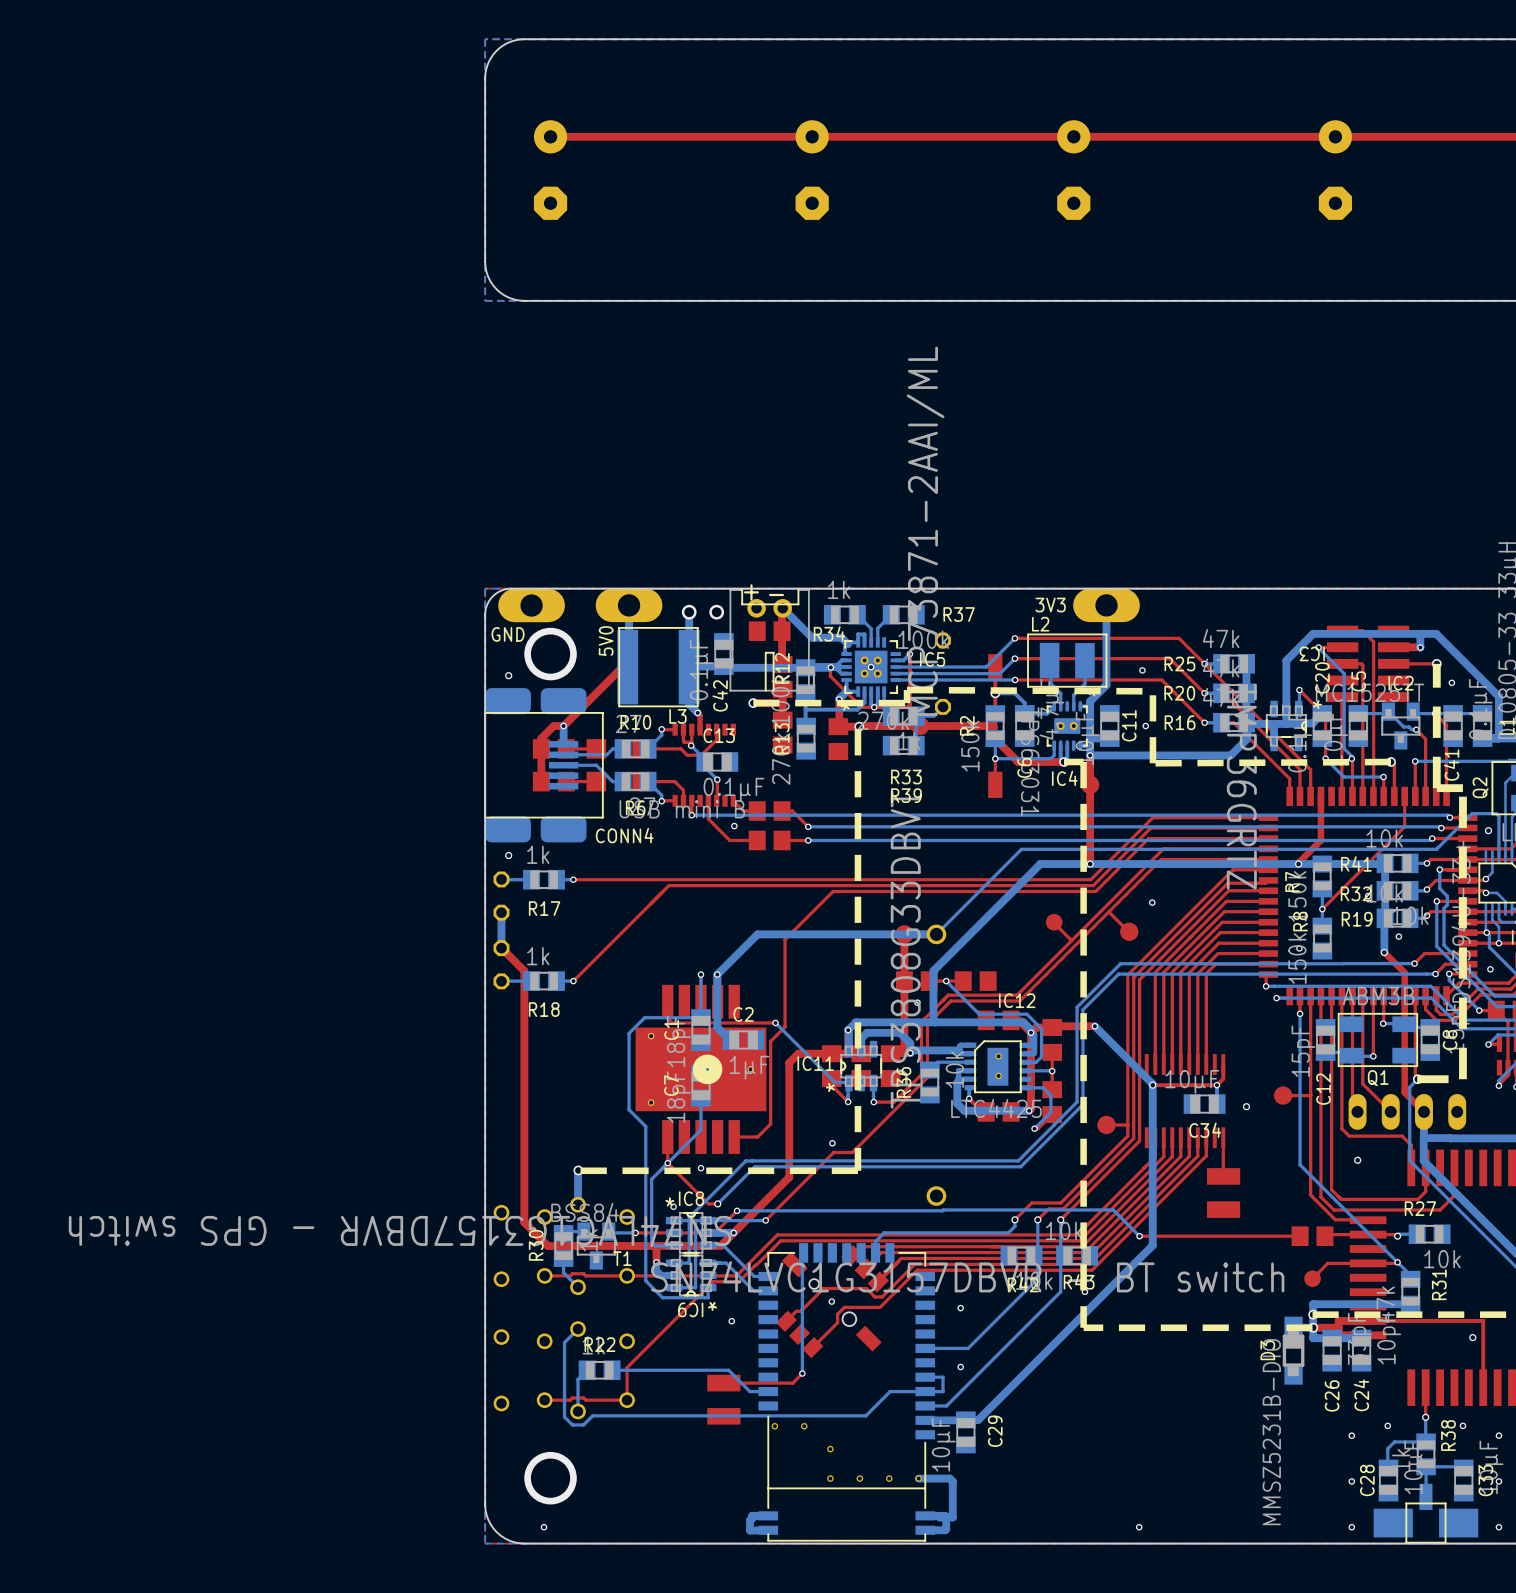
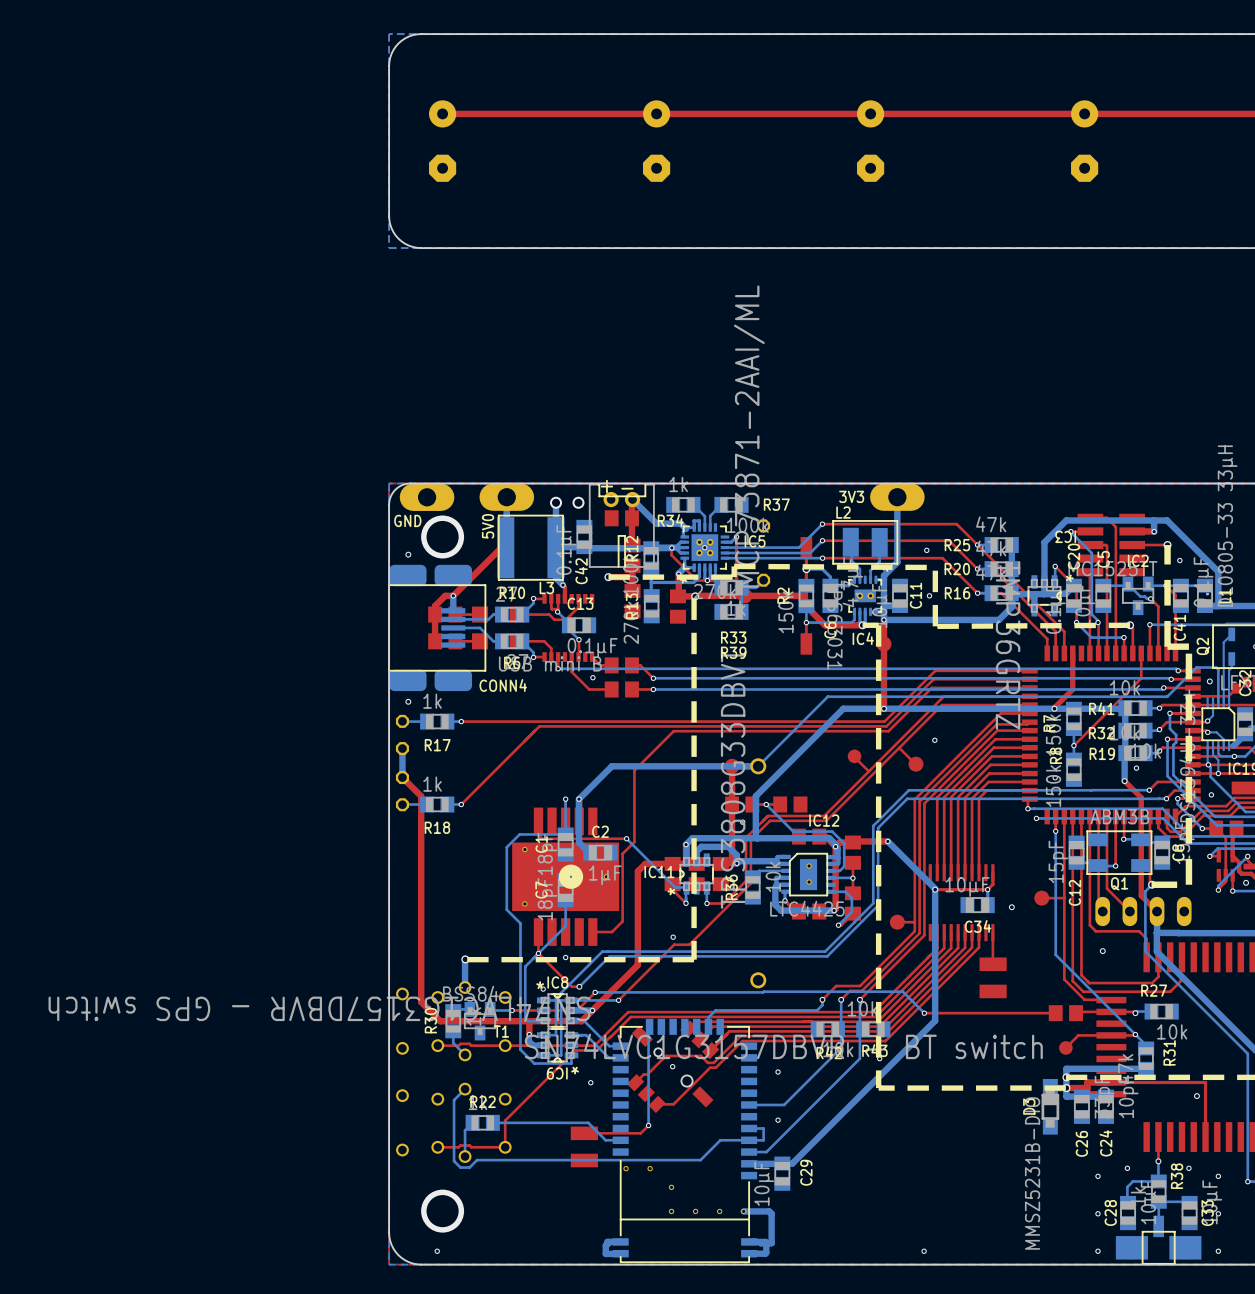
top track: (884, 1302) (880, 1307) (844, 1307) (837, 1314) (837, 1322) (812, 1347) -> (715, 1067) (710, 1067) (673, 1104) (657, 1104)

